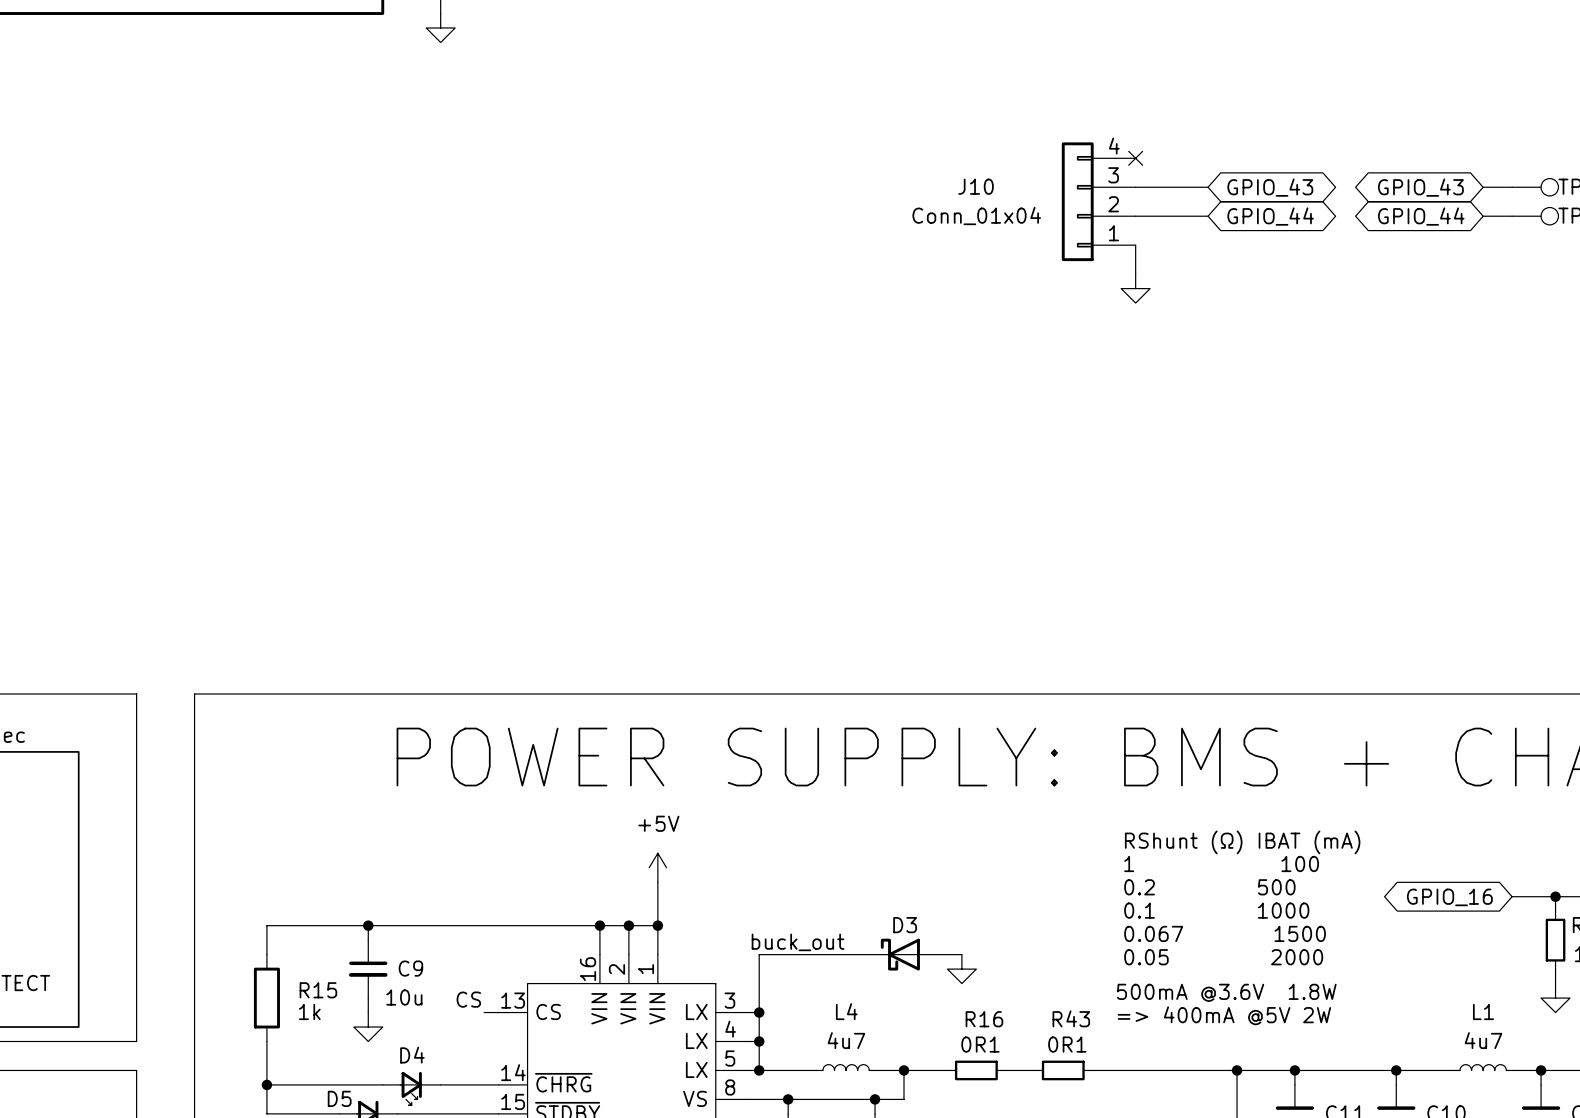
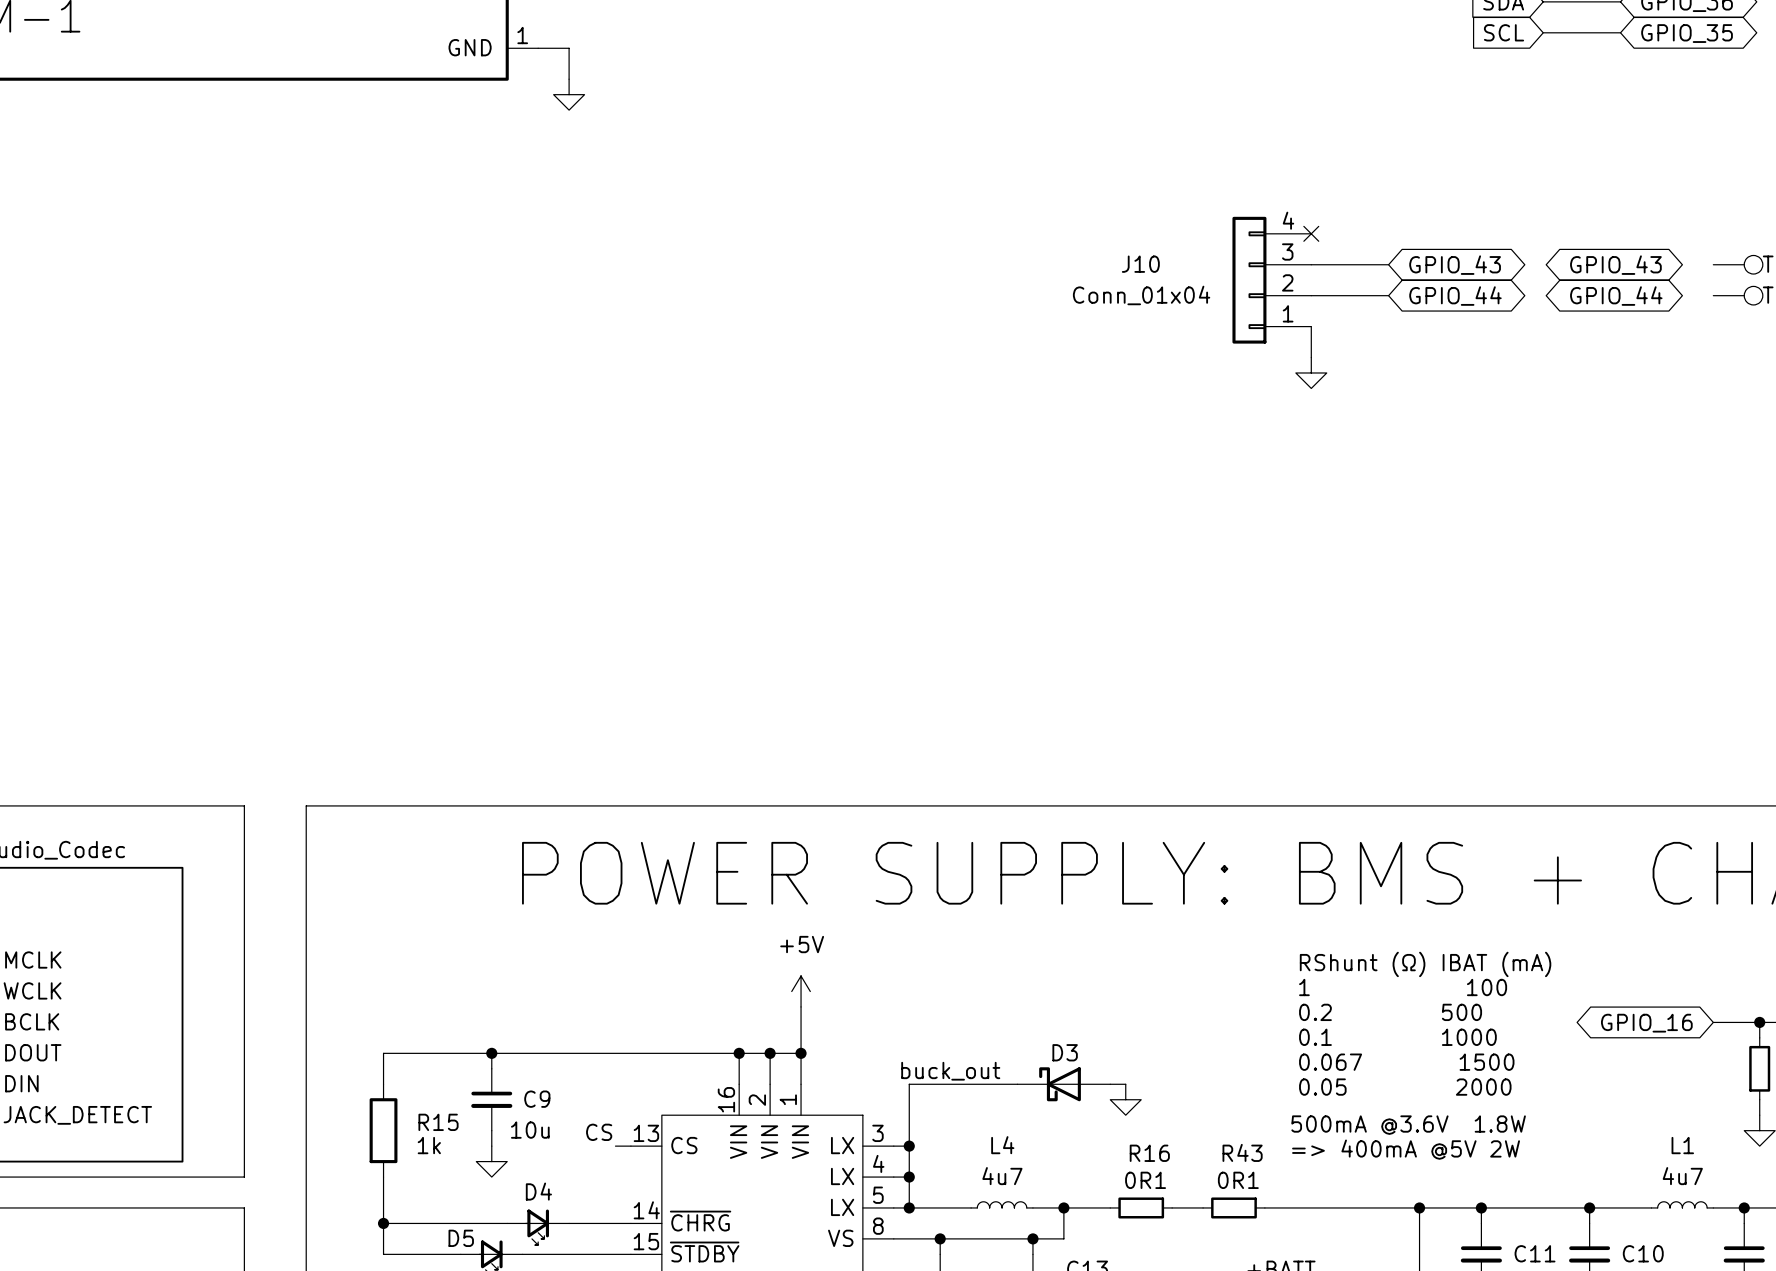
wire: (1483, 187) (1512, 187) -> none
wire: (1483, 216) (1512, 216) -> none

